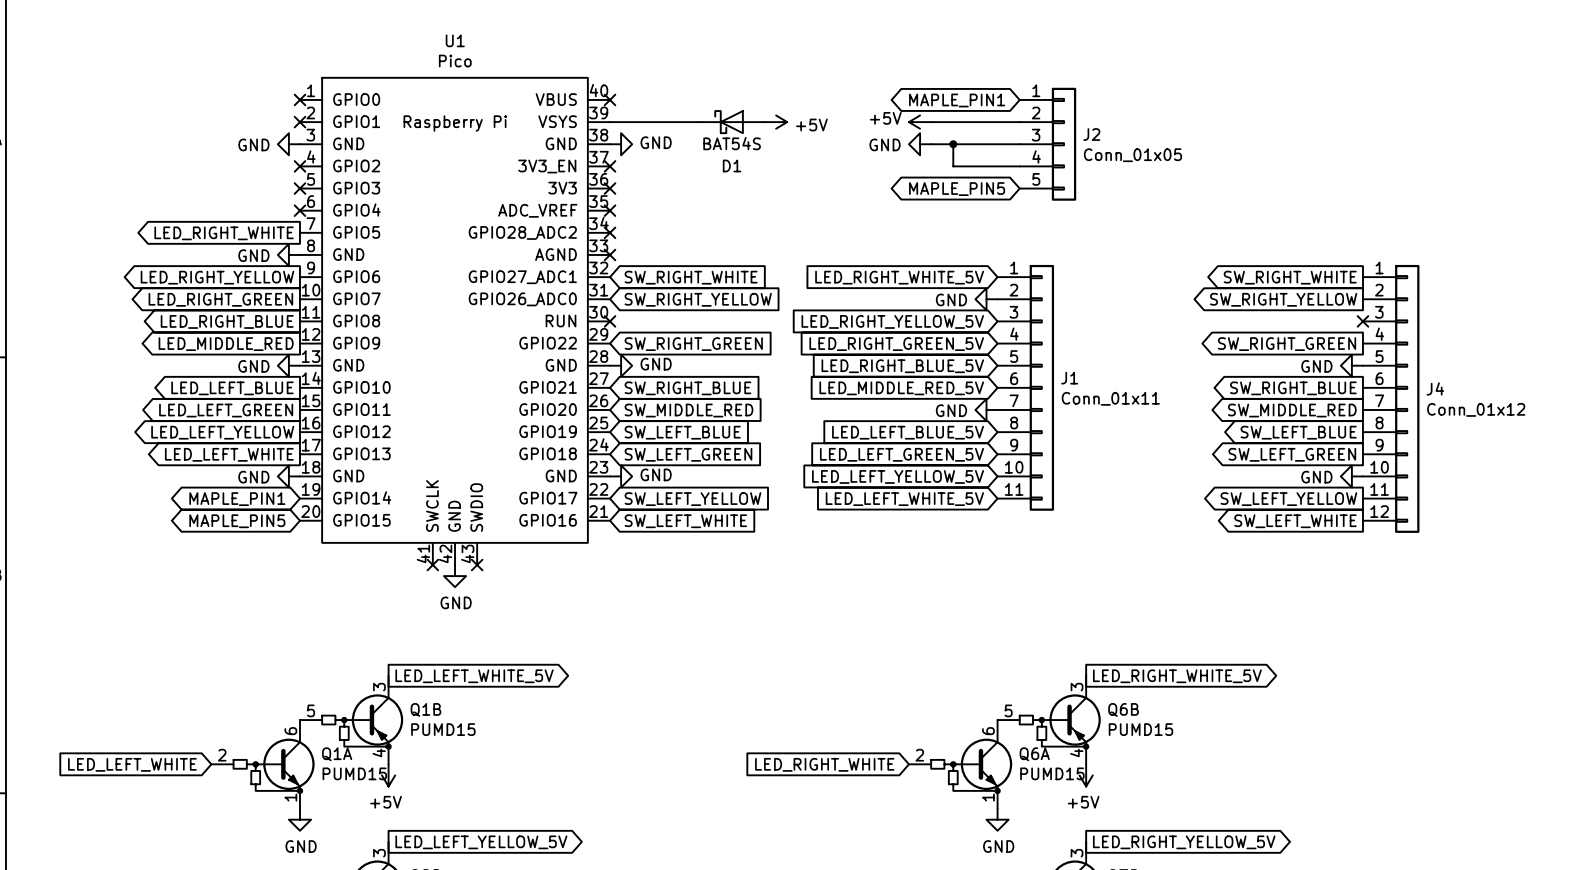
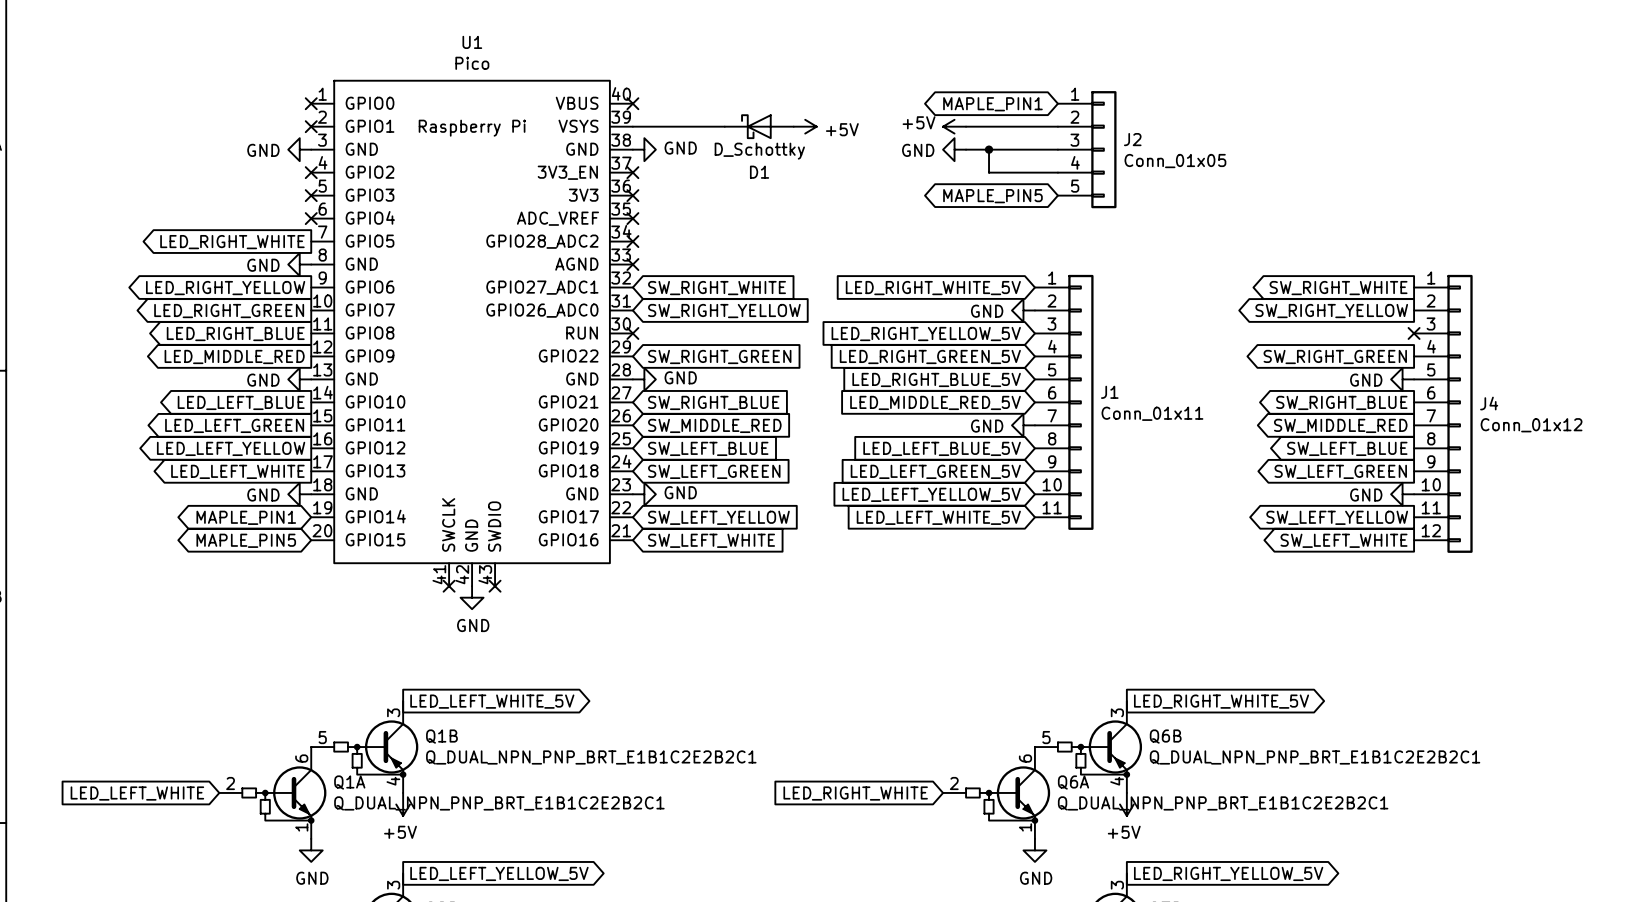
D1 value: BAT54S (732, 143) -> D_Schottky (759, 151)
Q1B value: PUMD15 (443, 729) -> Q_DUAL_NPN_PNP_BRT_E1B1C2E2B2C1 (591, 757)
Q6B value: PUMD15 (1140, 729) -> Q_DUAL_NPN_PNP_BRT_E1B1C2E2B2C1 (1315, 757)
Q1A value: PUMD15 (354, 773) -> Q_DUAL_NPN_PNP_BRT_E1B1C2E2B2C1 (499, 803)
Q6A value: PUMD15 (1052, 773) -> Q_DUAL_NPN_PNP_BRT_E1B1C2E2B2C1 (1223, 803)

